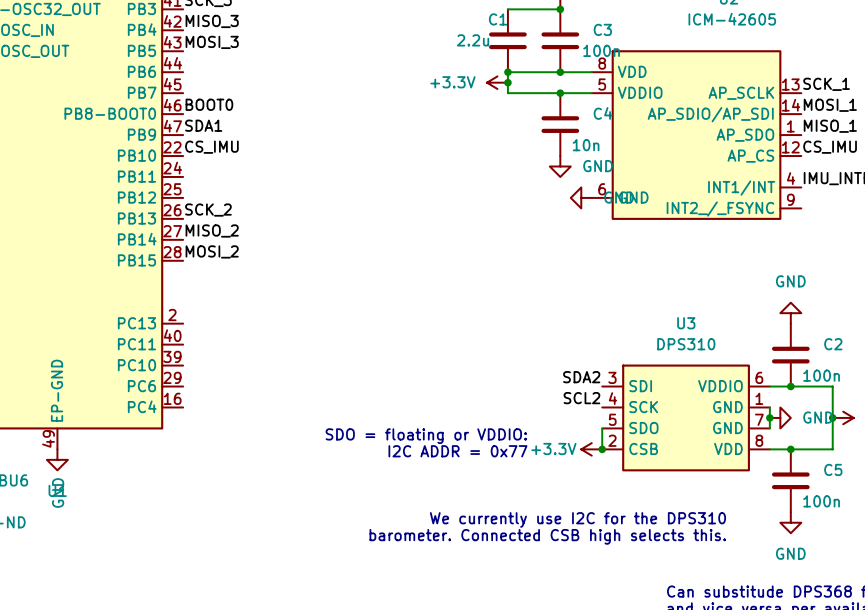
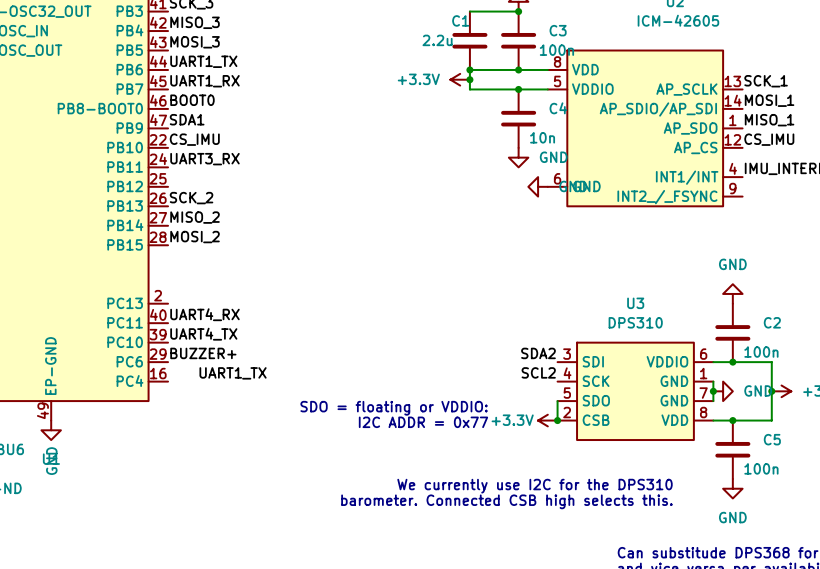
label: none -> UART1_TX (203, 61)
label: none -> UART1_RX (204, 81)
label: none -> UART3_RX (204, 159)
label: none -> UART4_RX (204, 314)
label: none -> UART4_TX (203, 334)
label: none -> BUZZER+ (203, 353)
label: none -> UART1_TX (233, 373)

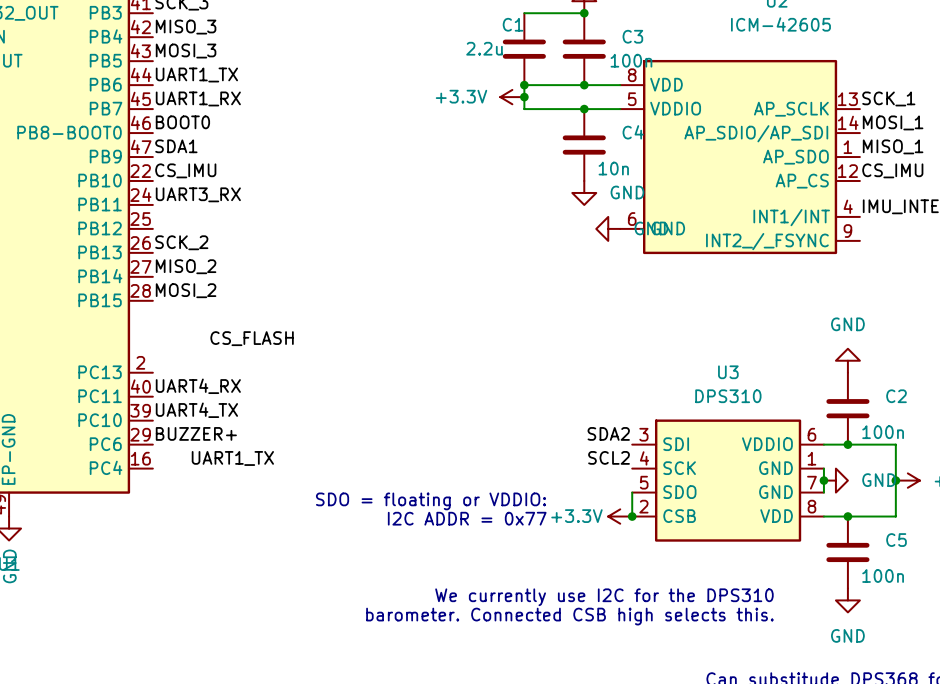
label: none -> CS_FLASH (252, 338)

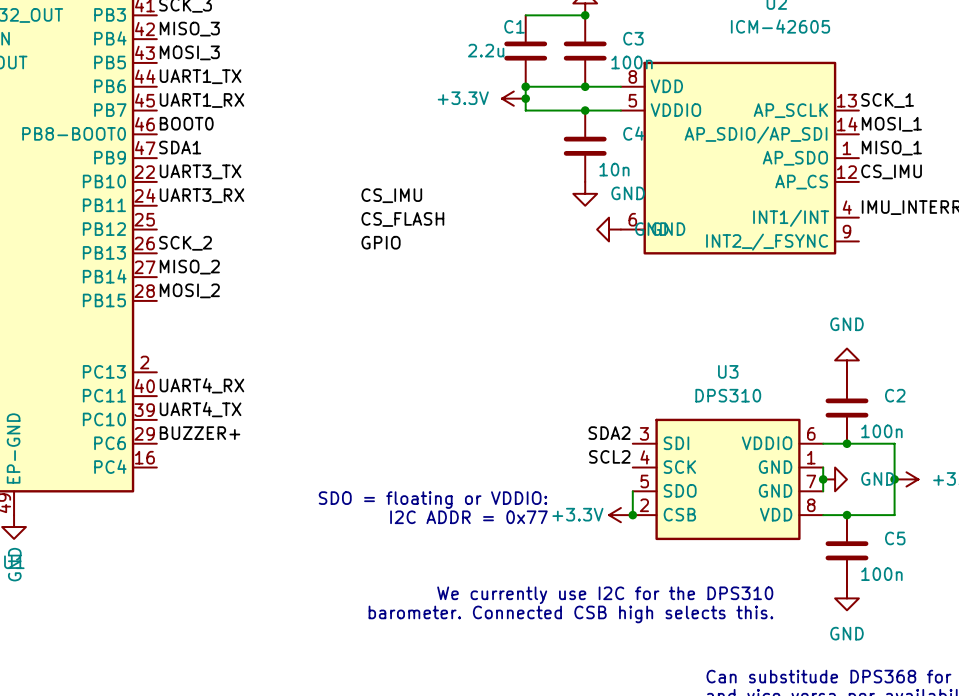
label: CS_IMU (185, 170) -> UART3_TX (200, 171)
label: none -> CS_IMU (391, 195)
label: none -> GPIO (381, 242)
label position: CS_FLASH (252, 338) -> CS_FLASH (402, 219)
label: UART1_TX (232, 458) -> none

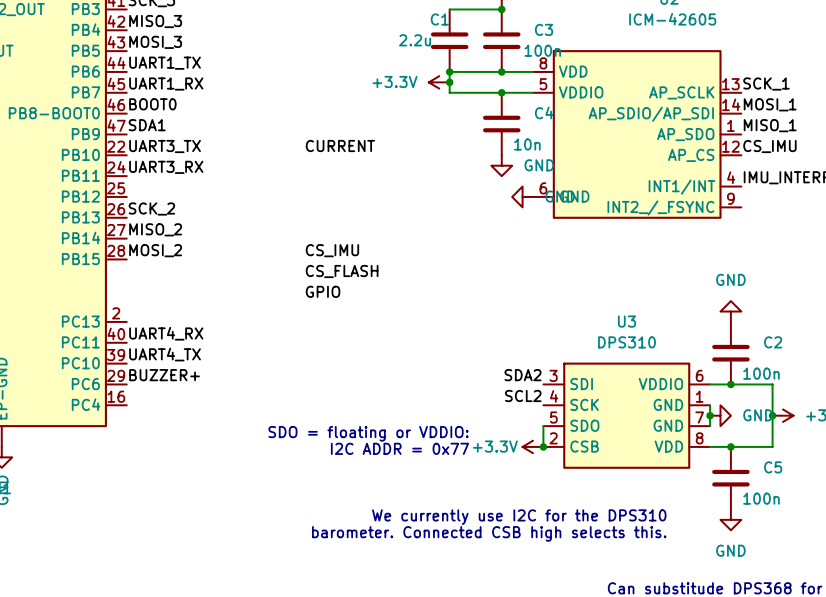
label: none -> CURRENT (340, 146)
label position: CS_IMU (391, 195) -> CS_IMU (332, 250)
label position: CS_FLASH (402, 219) -> CS_FLASH (342, 271)
label position: GPIO (381, 242) -> GPIO (323, 291)

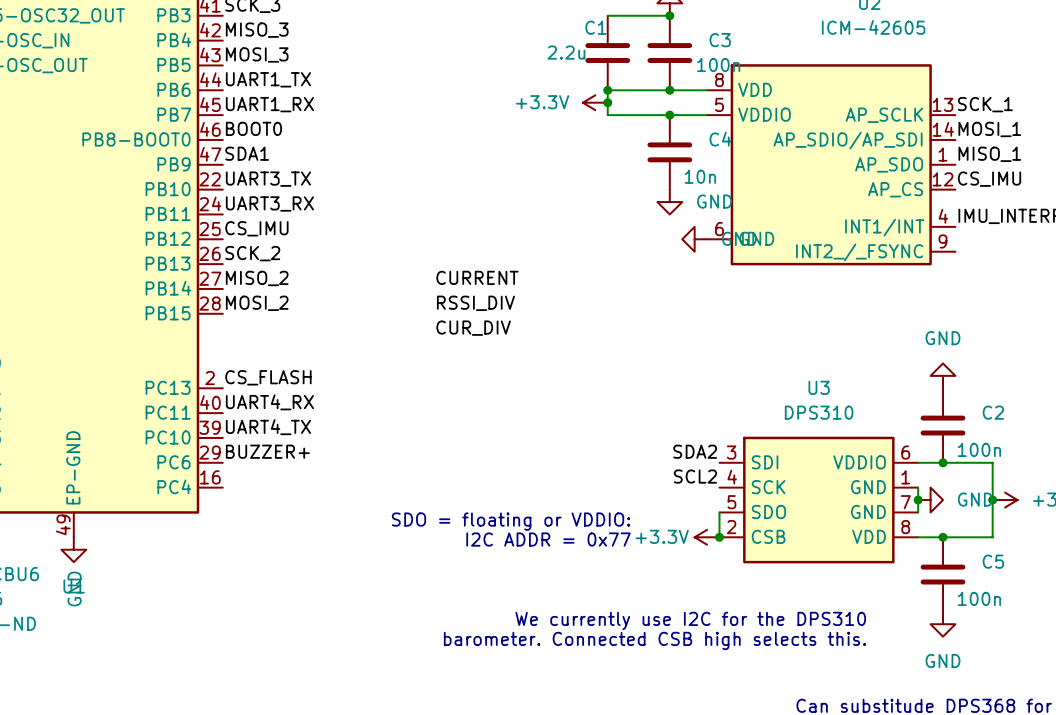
label position: CURRENT (340, 146) -> CURRENT (477, 277)
label: none -> CS_IMU (256, 228)
label: CS_IMU (332, 250) -> RSSI_DIV (475, 303)
label: CS_FLASH (342, 271) -> CUR_DIV (473, 328)
label: GPIO (323, 291) -> none
label: none -> CS_FLASH (268, 377)

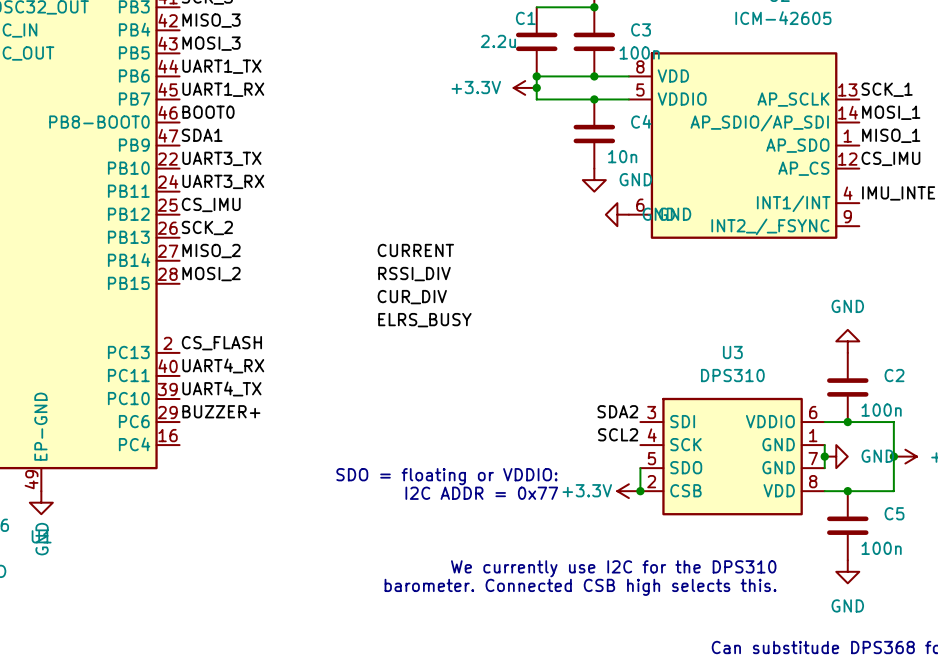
label: none -> ELRS_BUSY (424, 320)

